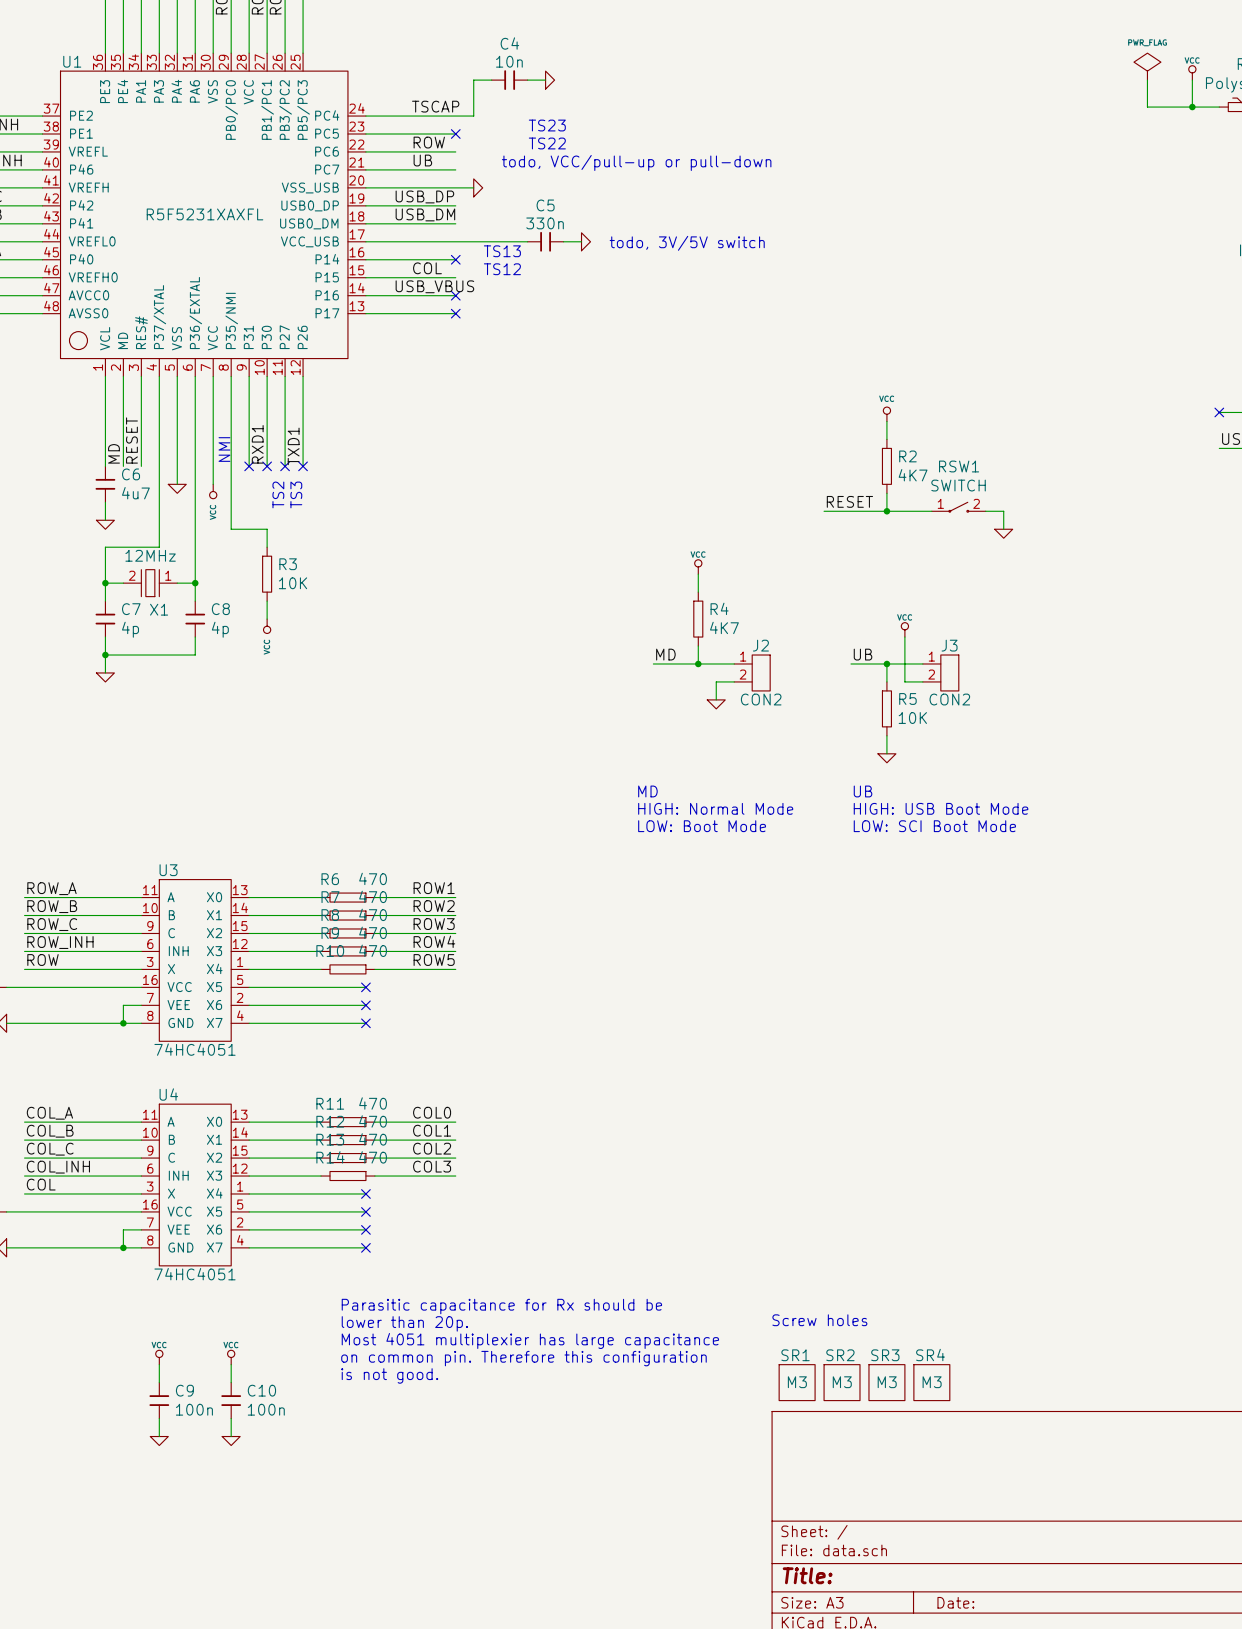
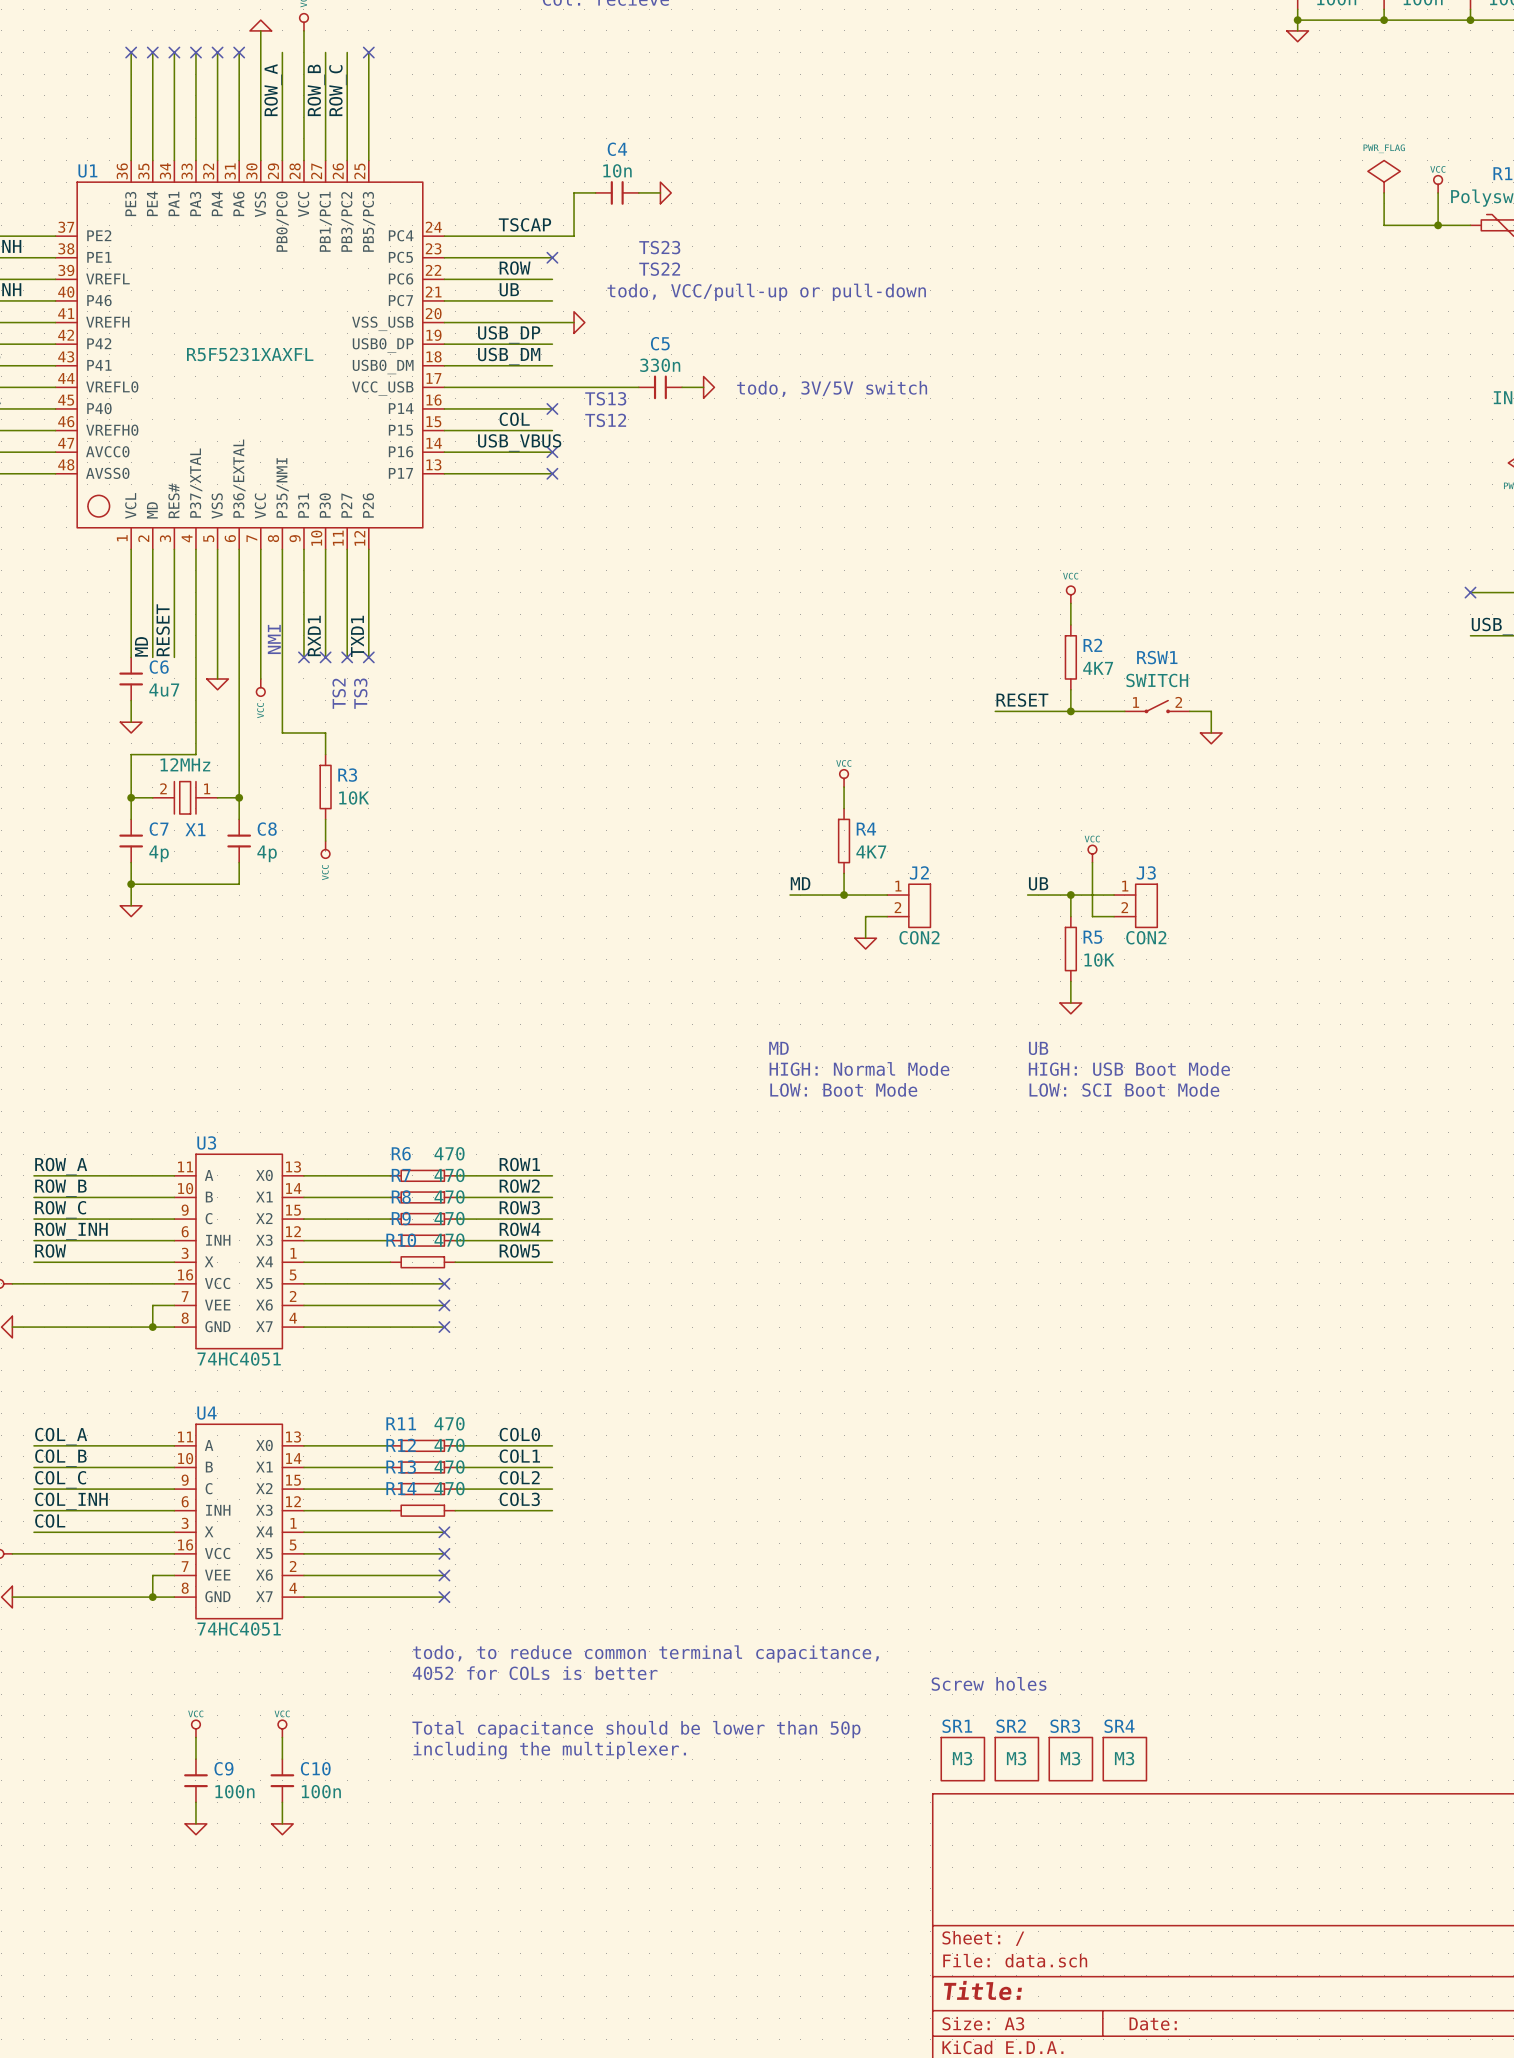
text: none -> todo, to reduce common terminal capacitance, (645, 1653)
text: Parasitic capacitance for Rx should be (501, 1306) -> none
text: none -> 4052 for COLs is better (535, 1673)
text: lower than 20p. (404, 1323) -> none
text: Most 4051 multiplexier has large capacitance (530, 1340) -> none
text: on common pin. Therefore this configuration (523, 1358) -> Total capacitance should be lower than 50p (636, 1729)
text: is not good. (389, 1375) -> including the multiplexer. (549, 1750)

